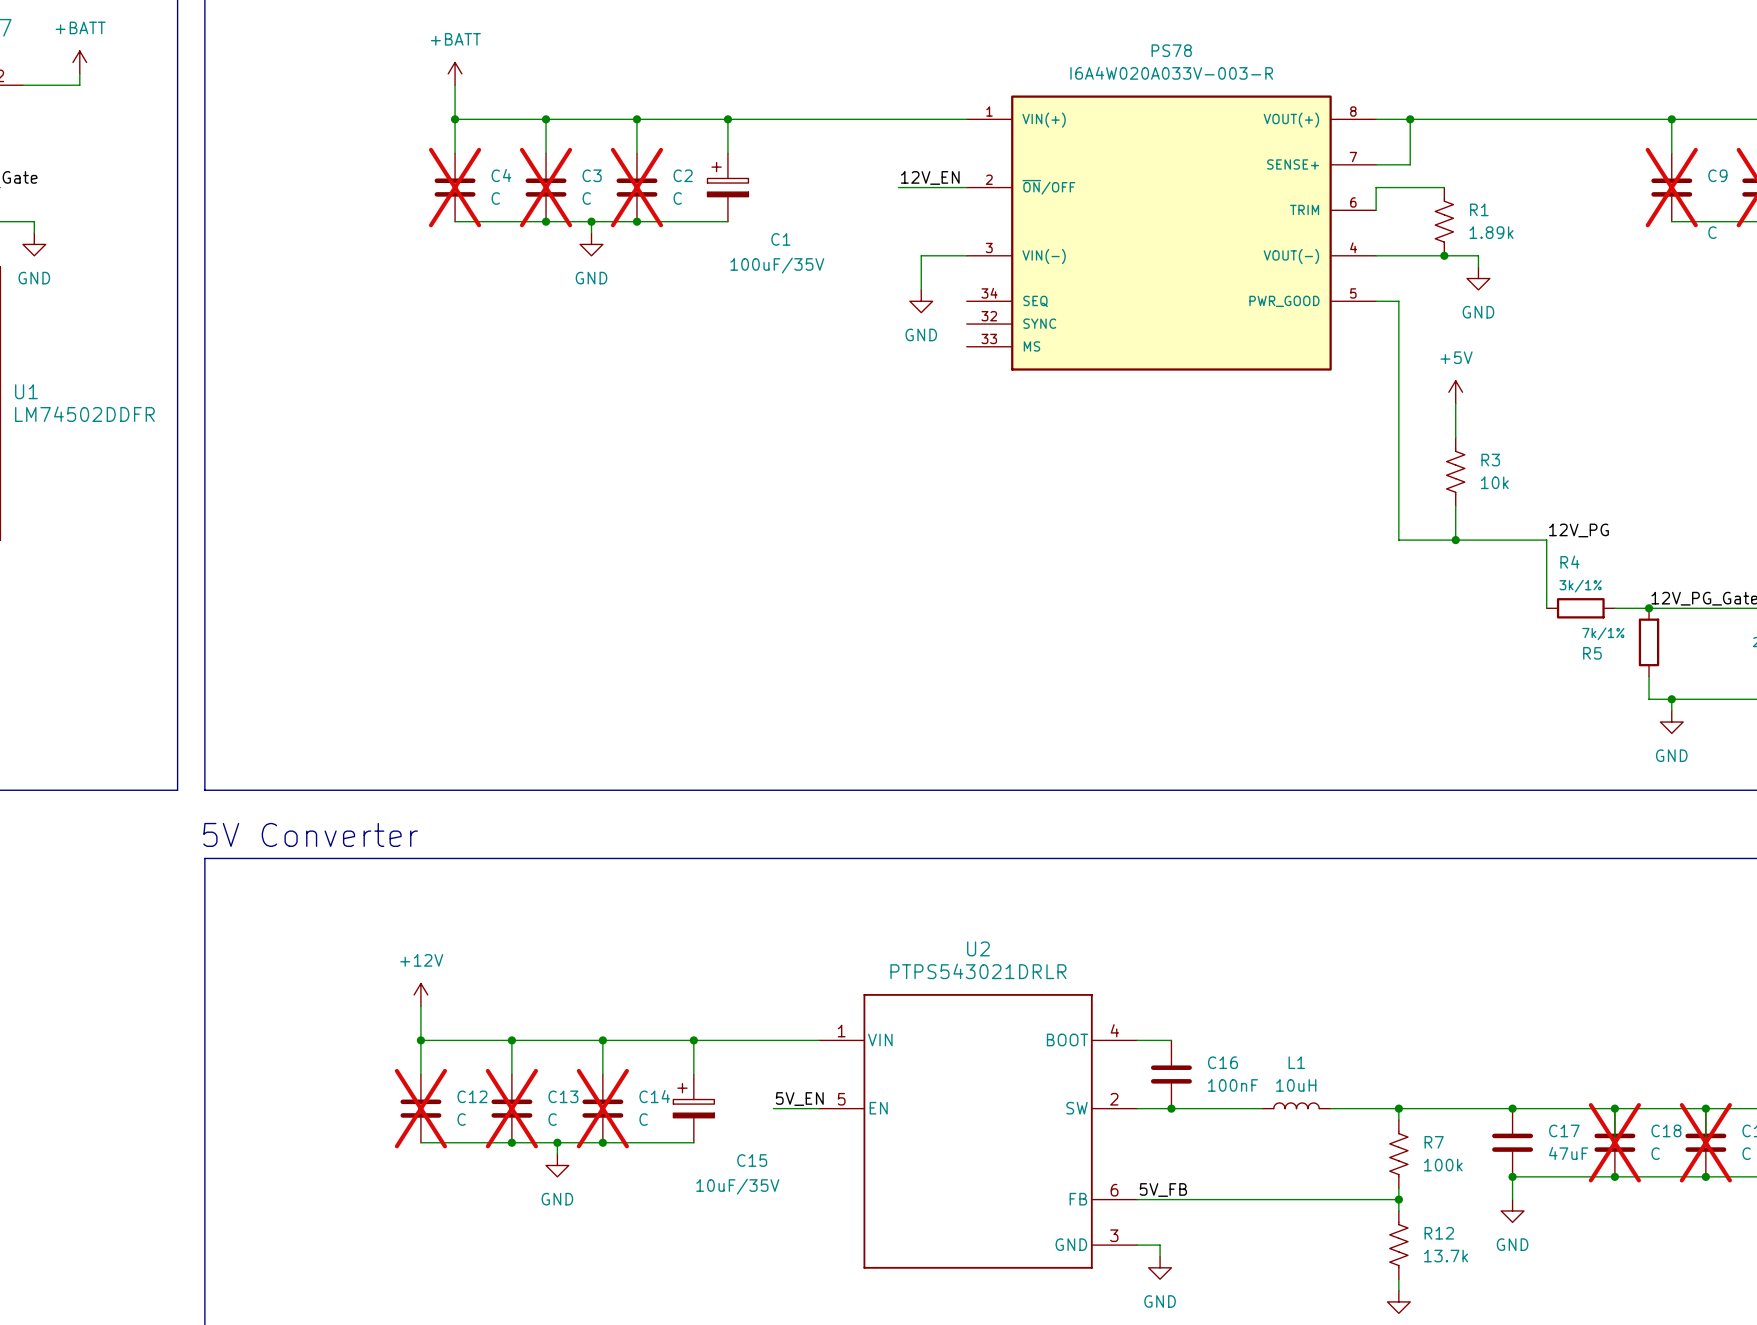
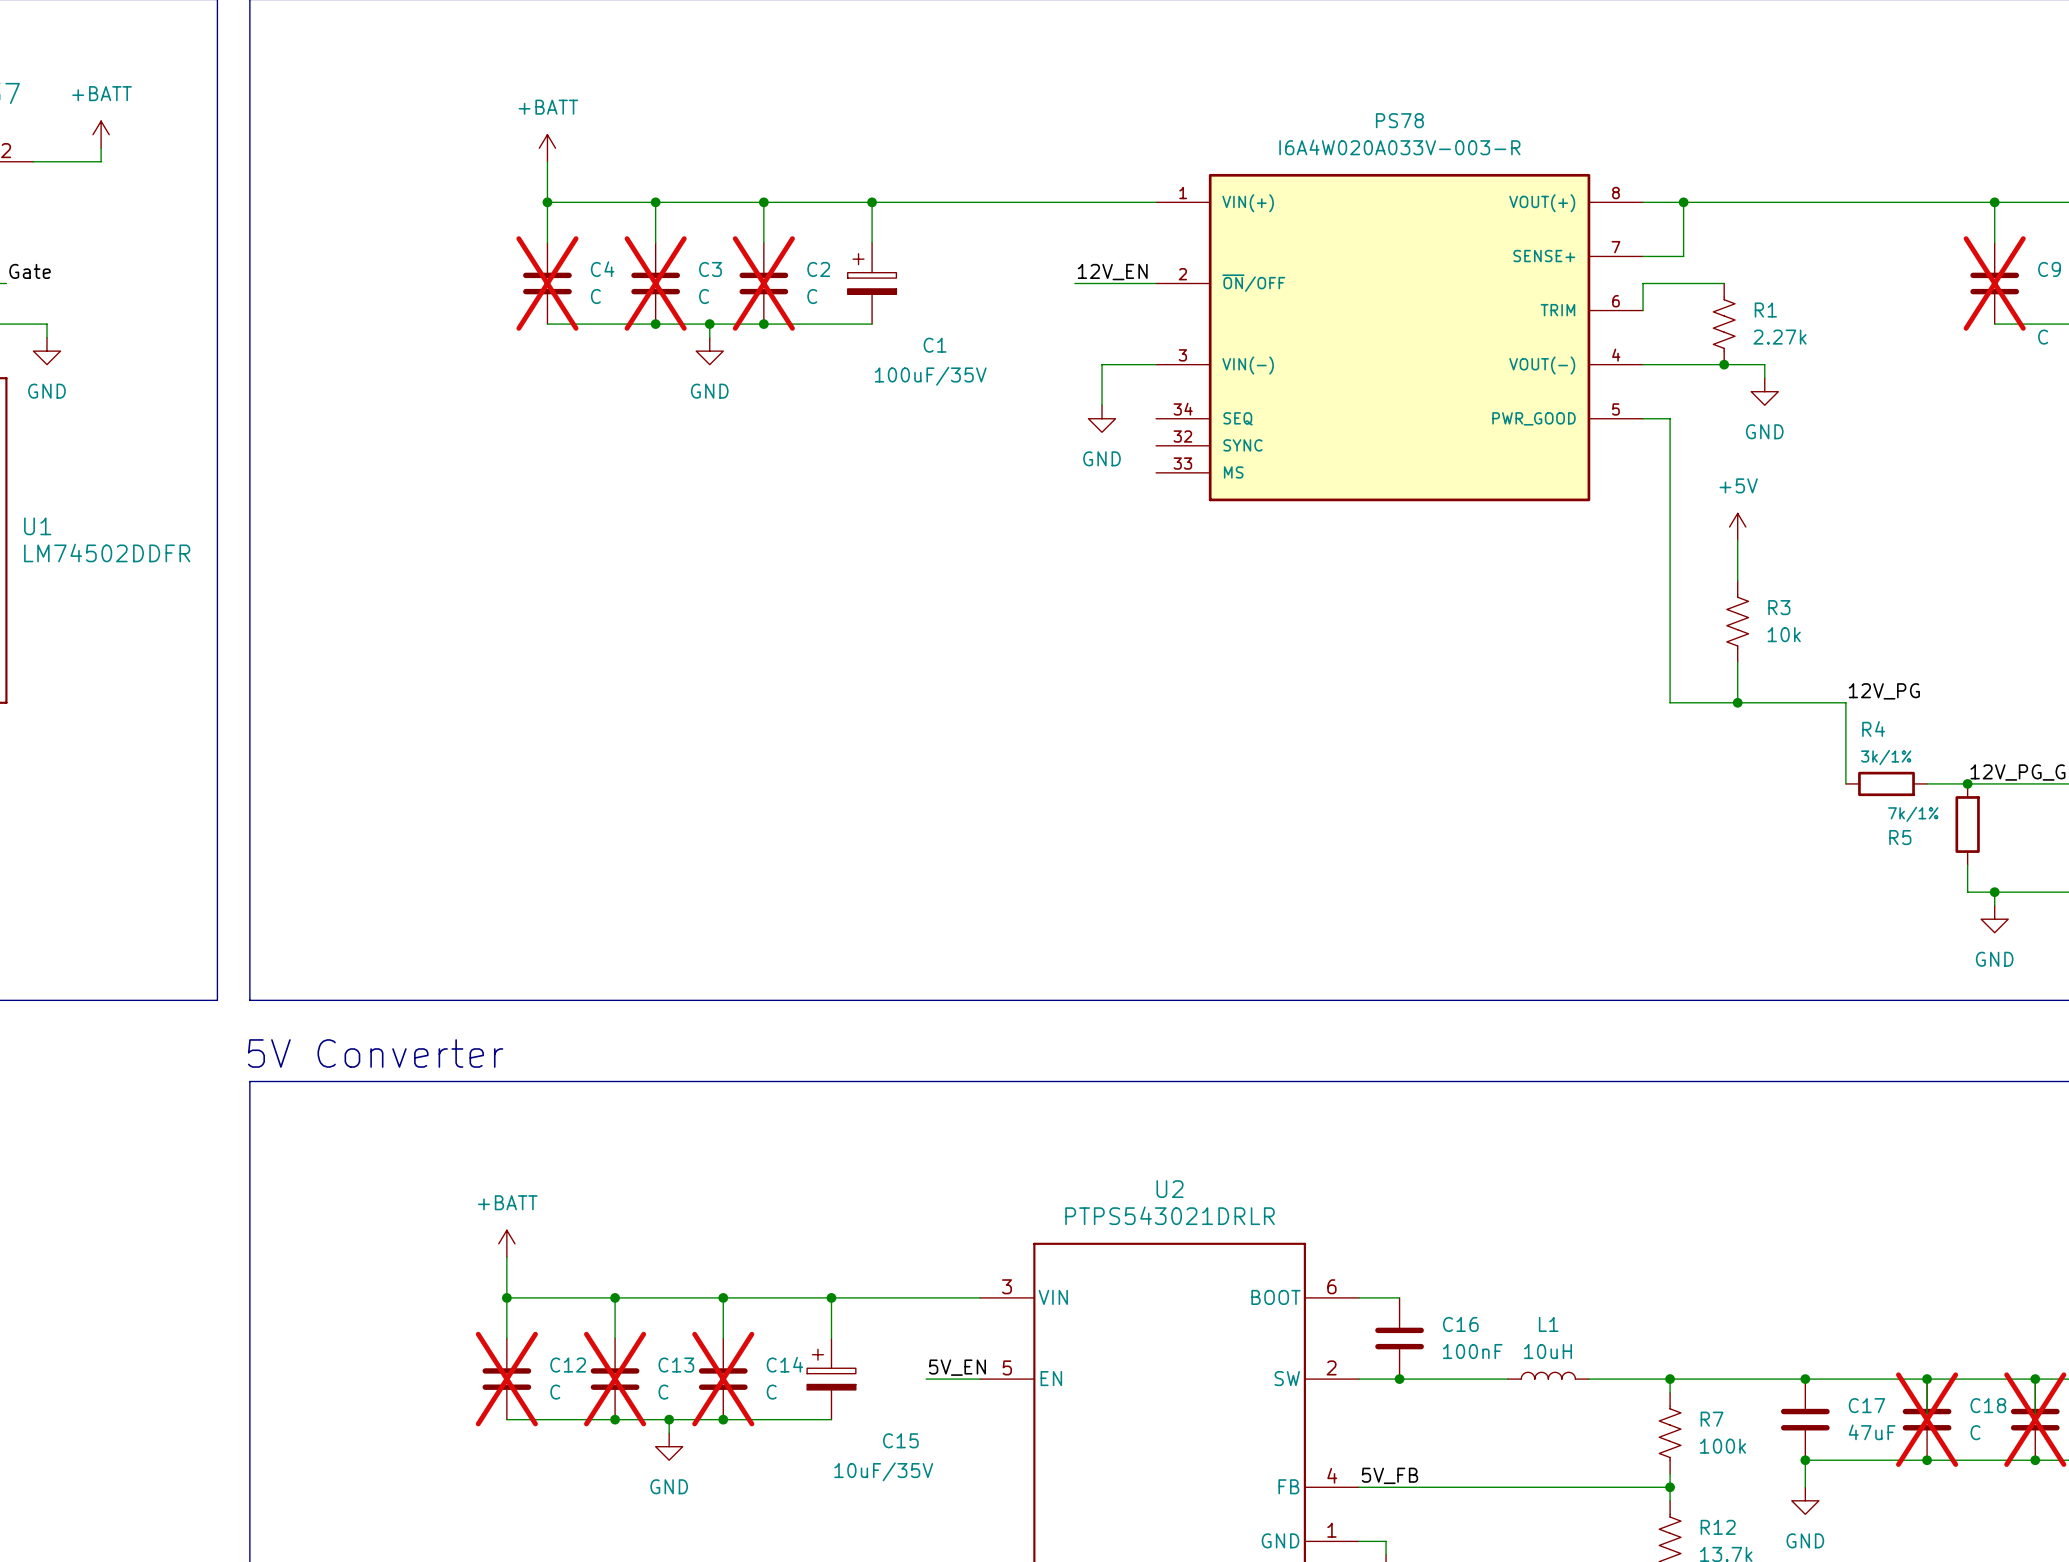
R1 value: 1.89k (1491, 232) -> 2.27k (1779, 337)
power symbol: +12V (420, 994) -> +BATT (506, 1243)
U2 pin number: 4 (1114, 1030) -> 6 (1331, 1286)
U2 pin number: 1 (841, 1031) -> 3 (1006, 1286)
U2 pin number: 6 (1114, 1190) -> 4 (1332, 1475)
U2 pin number: 3 (1114, 1235) -> 1 (1331, 1530)

